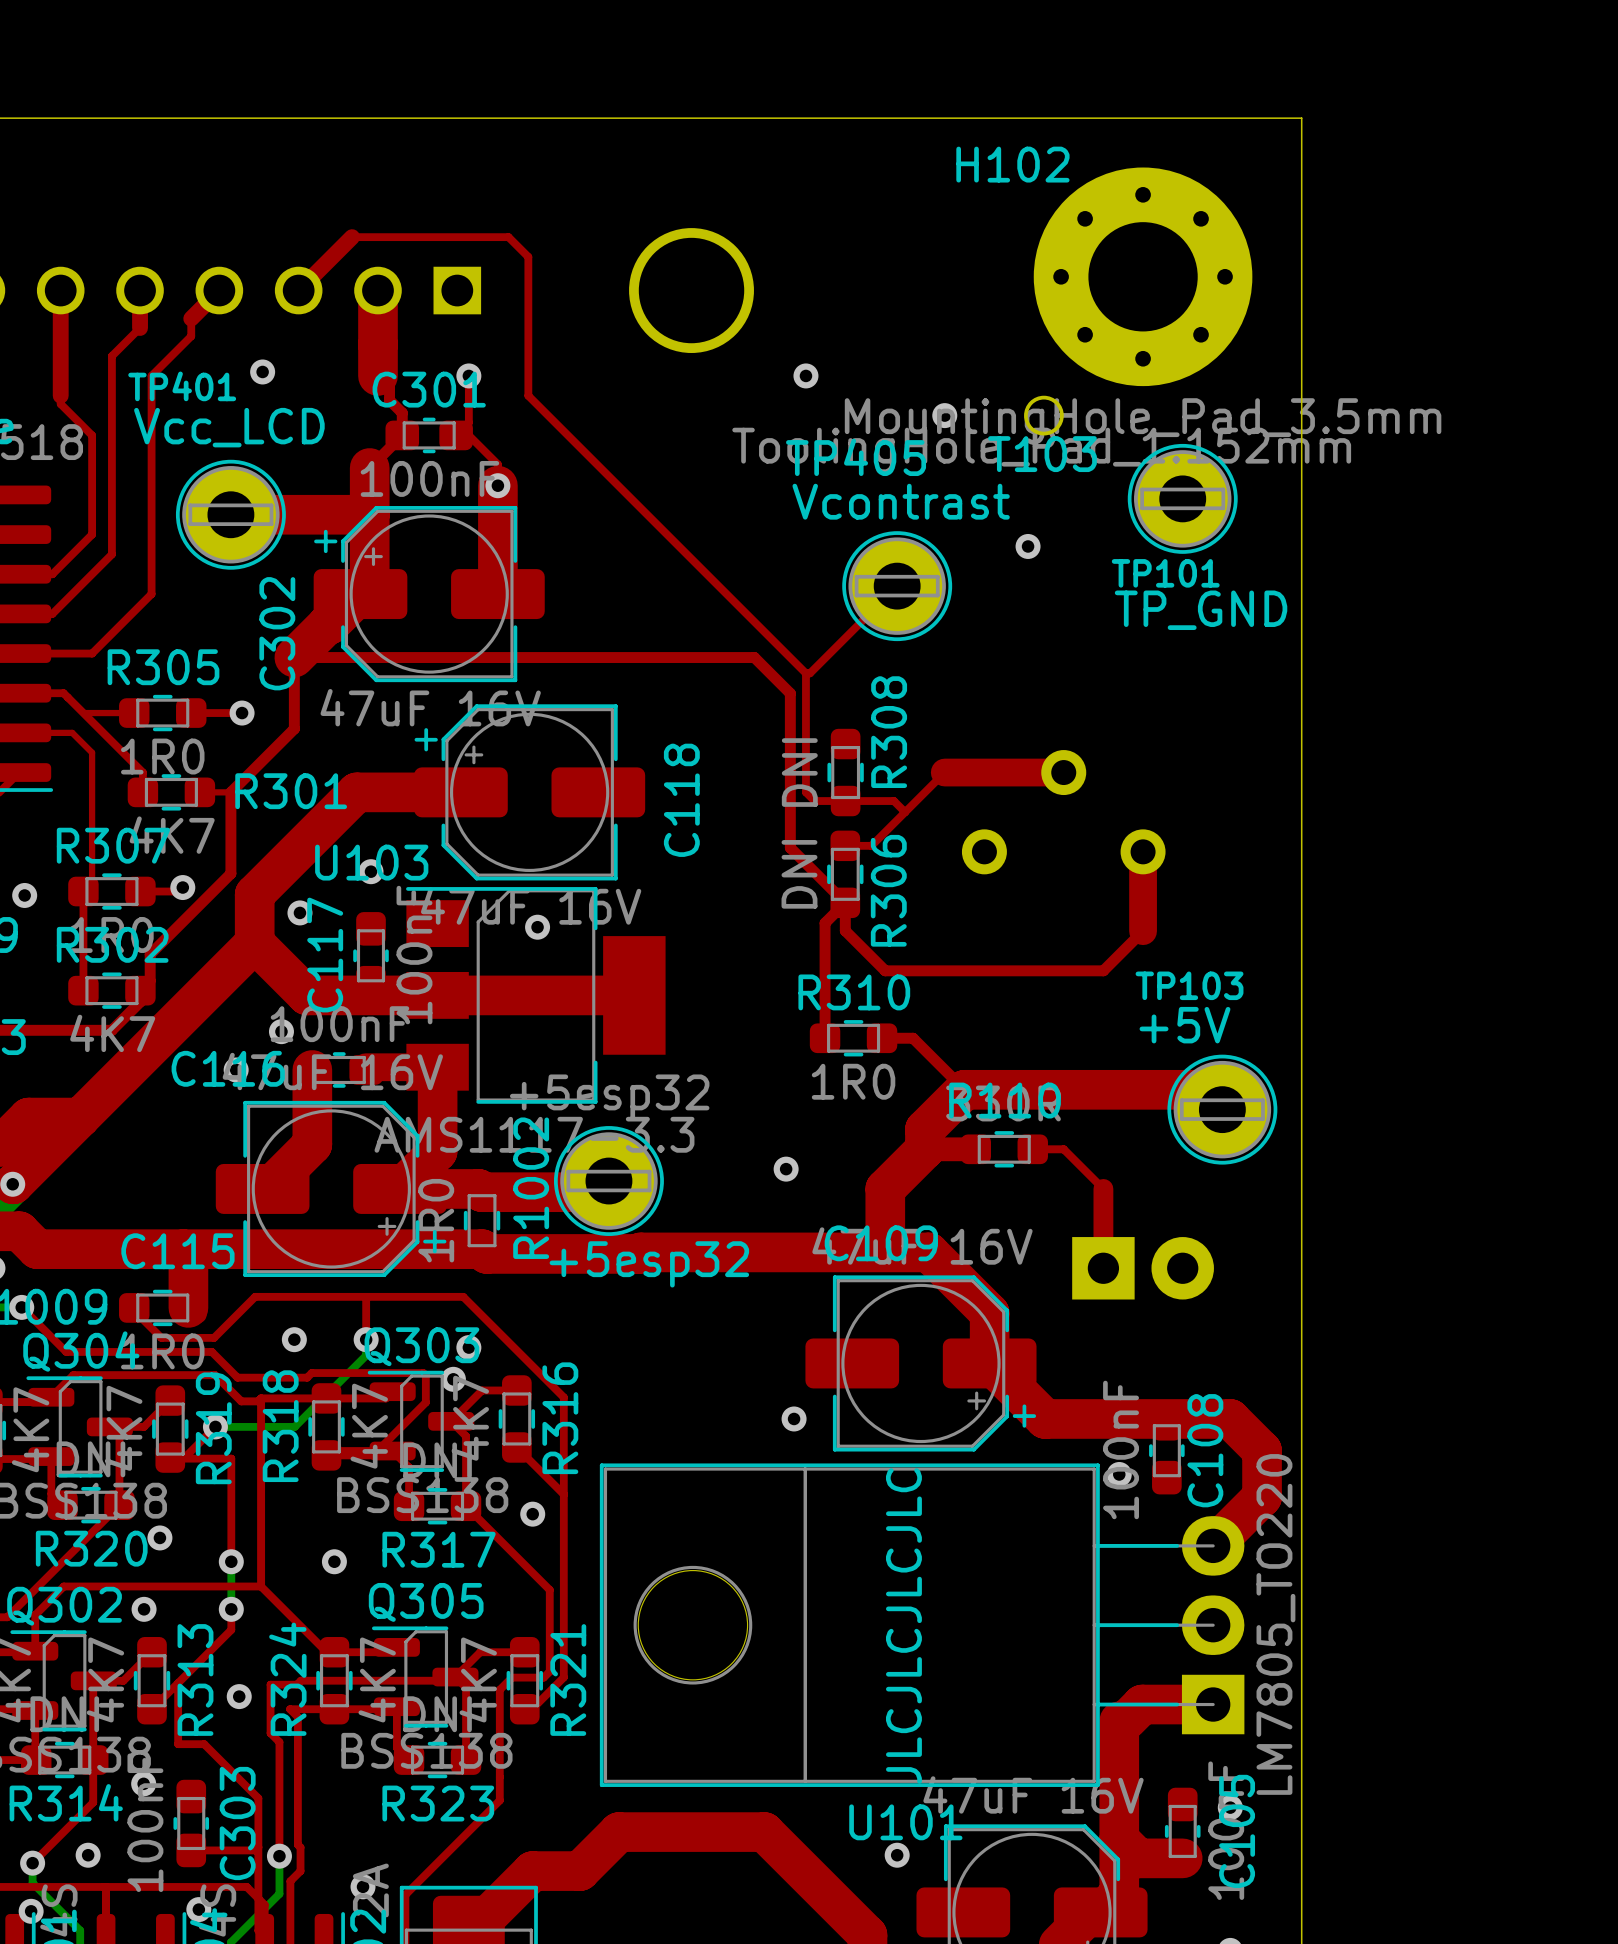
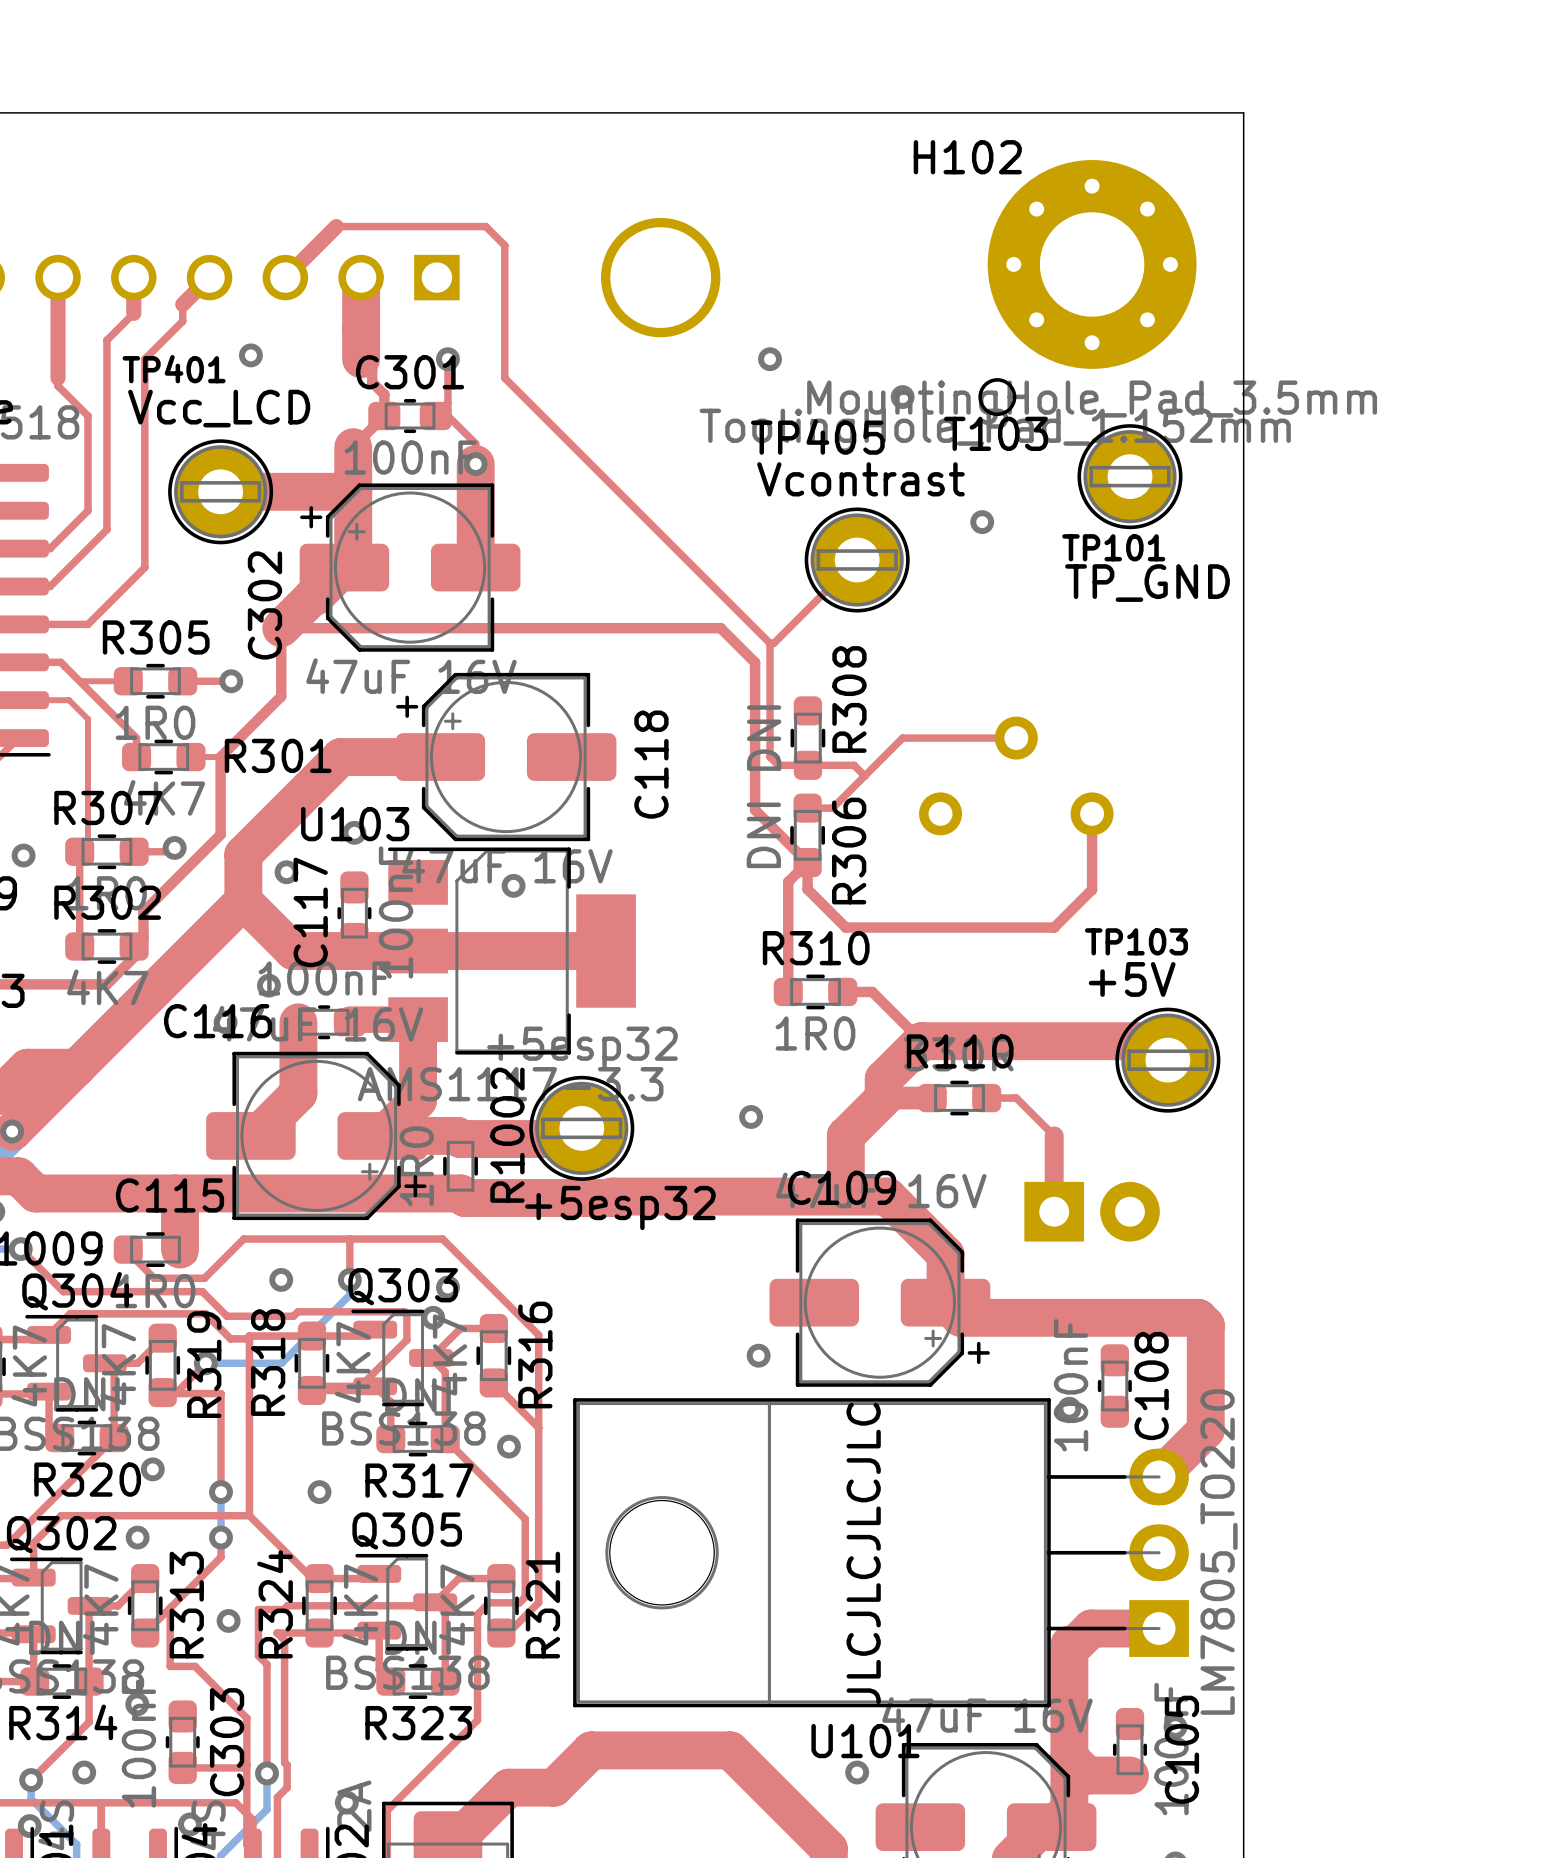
top track width: thick (944, 772) (1063, 772) -> thin (902, 738) (1016, 738)
top track width: thick (1143, 851) (1143, 931) -> thin (1092, 813) (1092, 889)
top track: (1005, 1379) (1045, 1418) (1230, 1418) (1262, 1450) -> (960, 1317) (1198, 1317) (1205, 1325) (1205, 1386)

